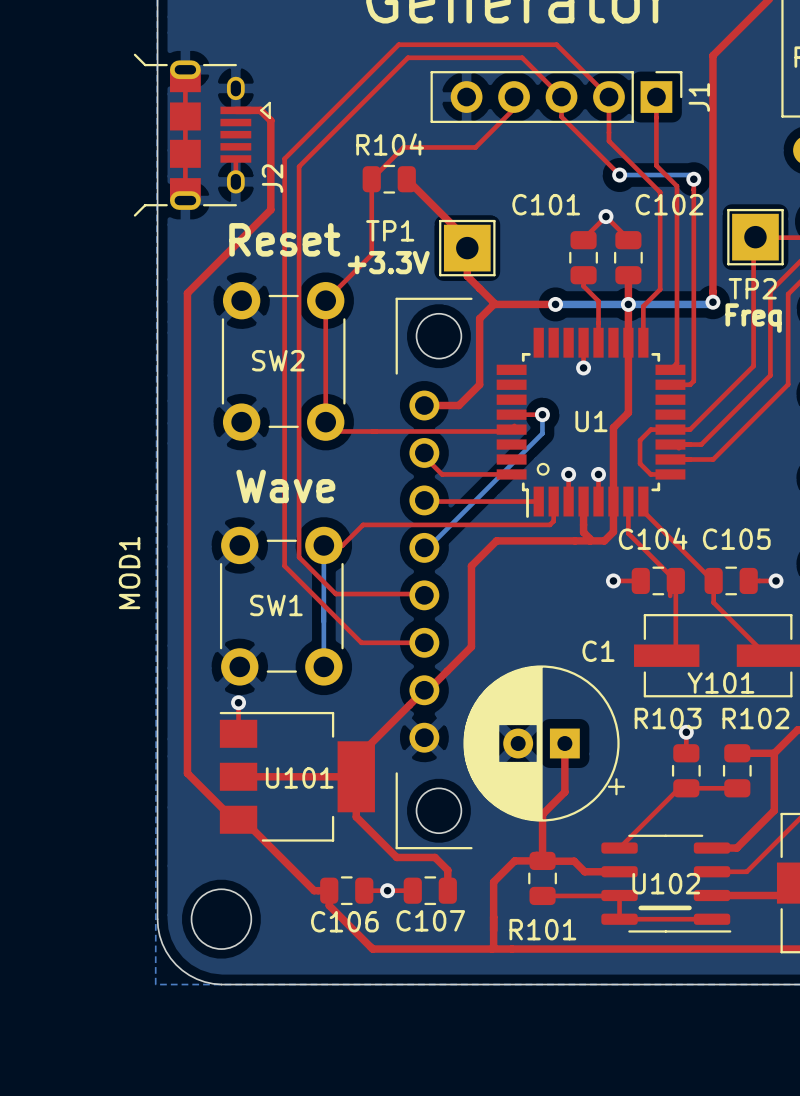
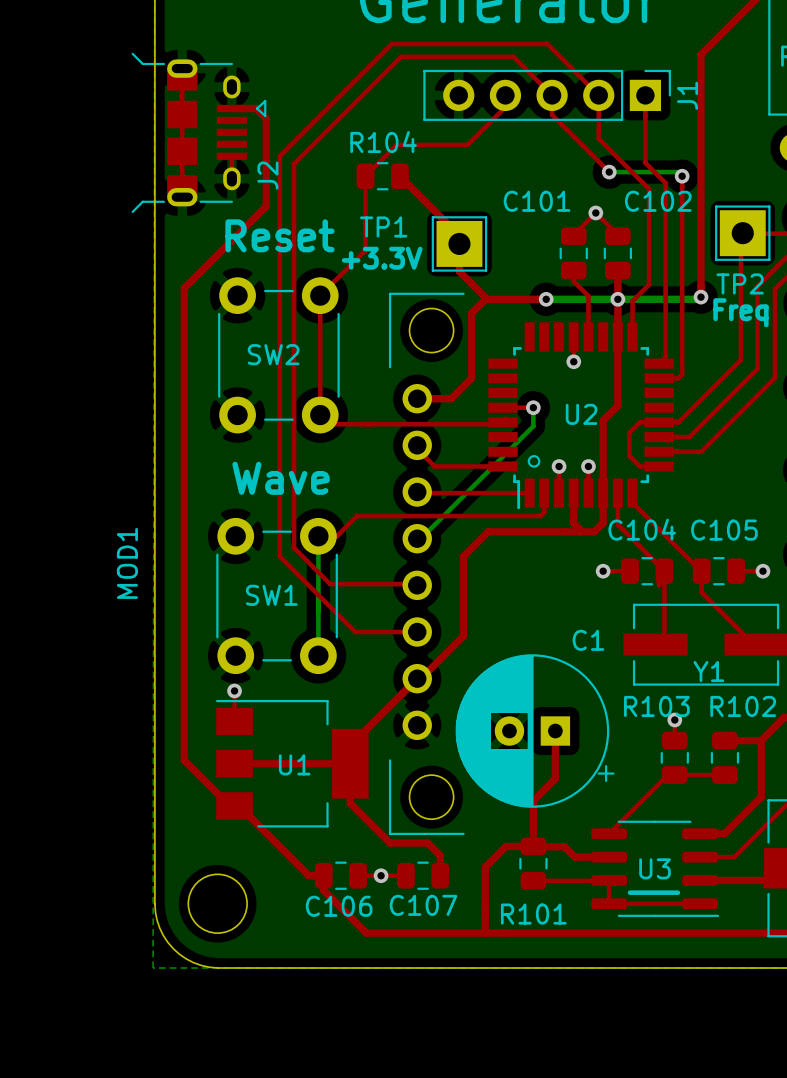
U1 name: U1 (591, 421) -> U2 (581, 414)
Y101 name: Y101 (720, 683) -> Y1 (708, 671)
U101 name: U101 (299, 777) -> U1 (294, 764)
U102 name: U102 (666, 883) -> U3 (655, 868)

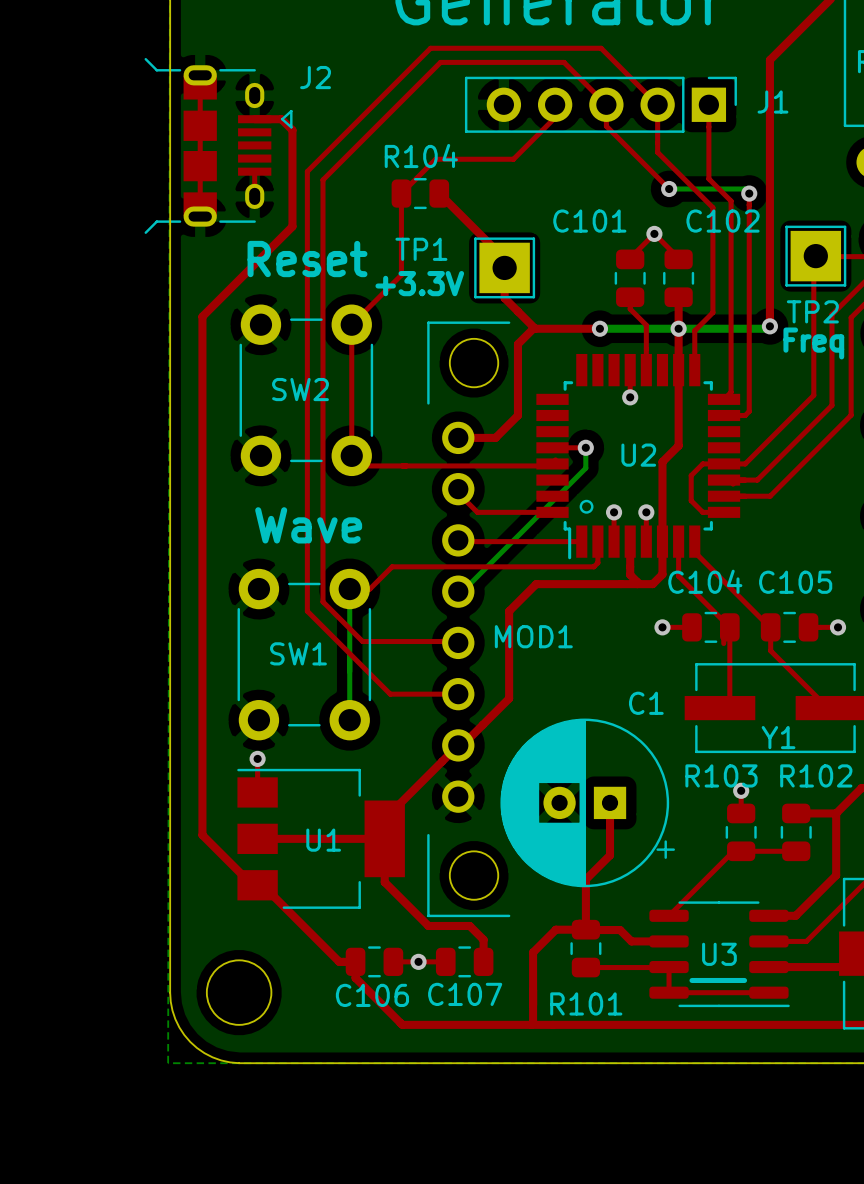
J1 name rotation: 0° (687, 95) -> 90° clockwise (772, 102)
J2 name rotation: 0° (267, 175) -> 90° clockwise (315, 77)
J2 name position: J2 (267, 175) -> J2 (315, 77)
MOD1 name rotation: 0° (127, 563) -> 90° clockwise (533, 636)
MOD1 name position: MOD1 (127, 563) -> MOD1 (533, 636)

